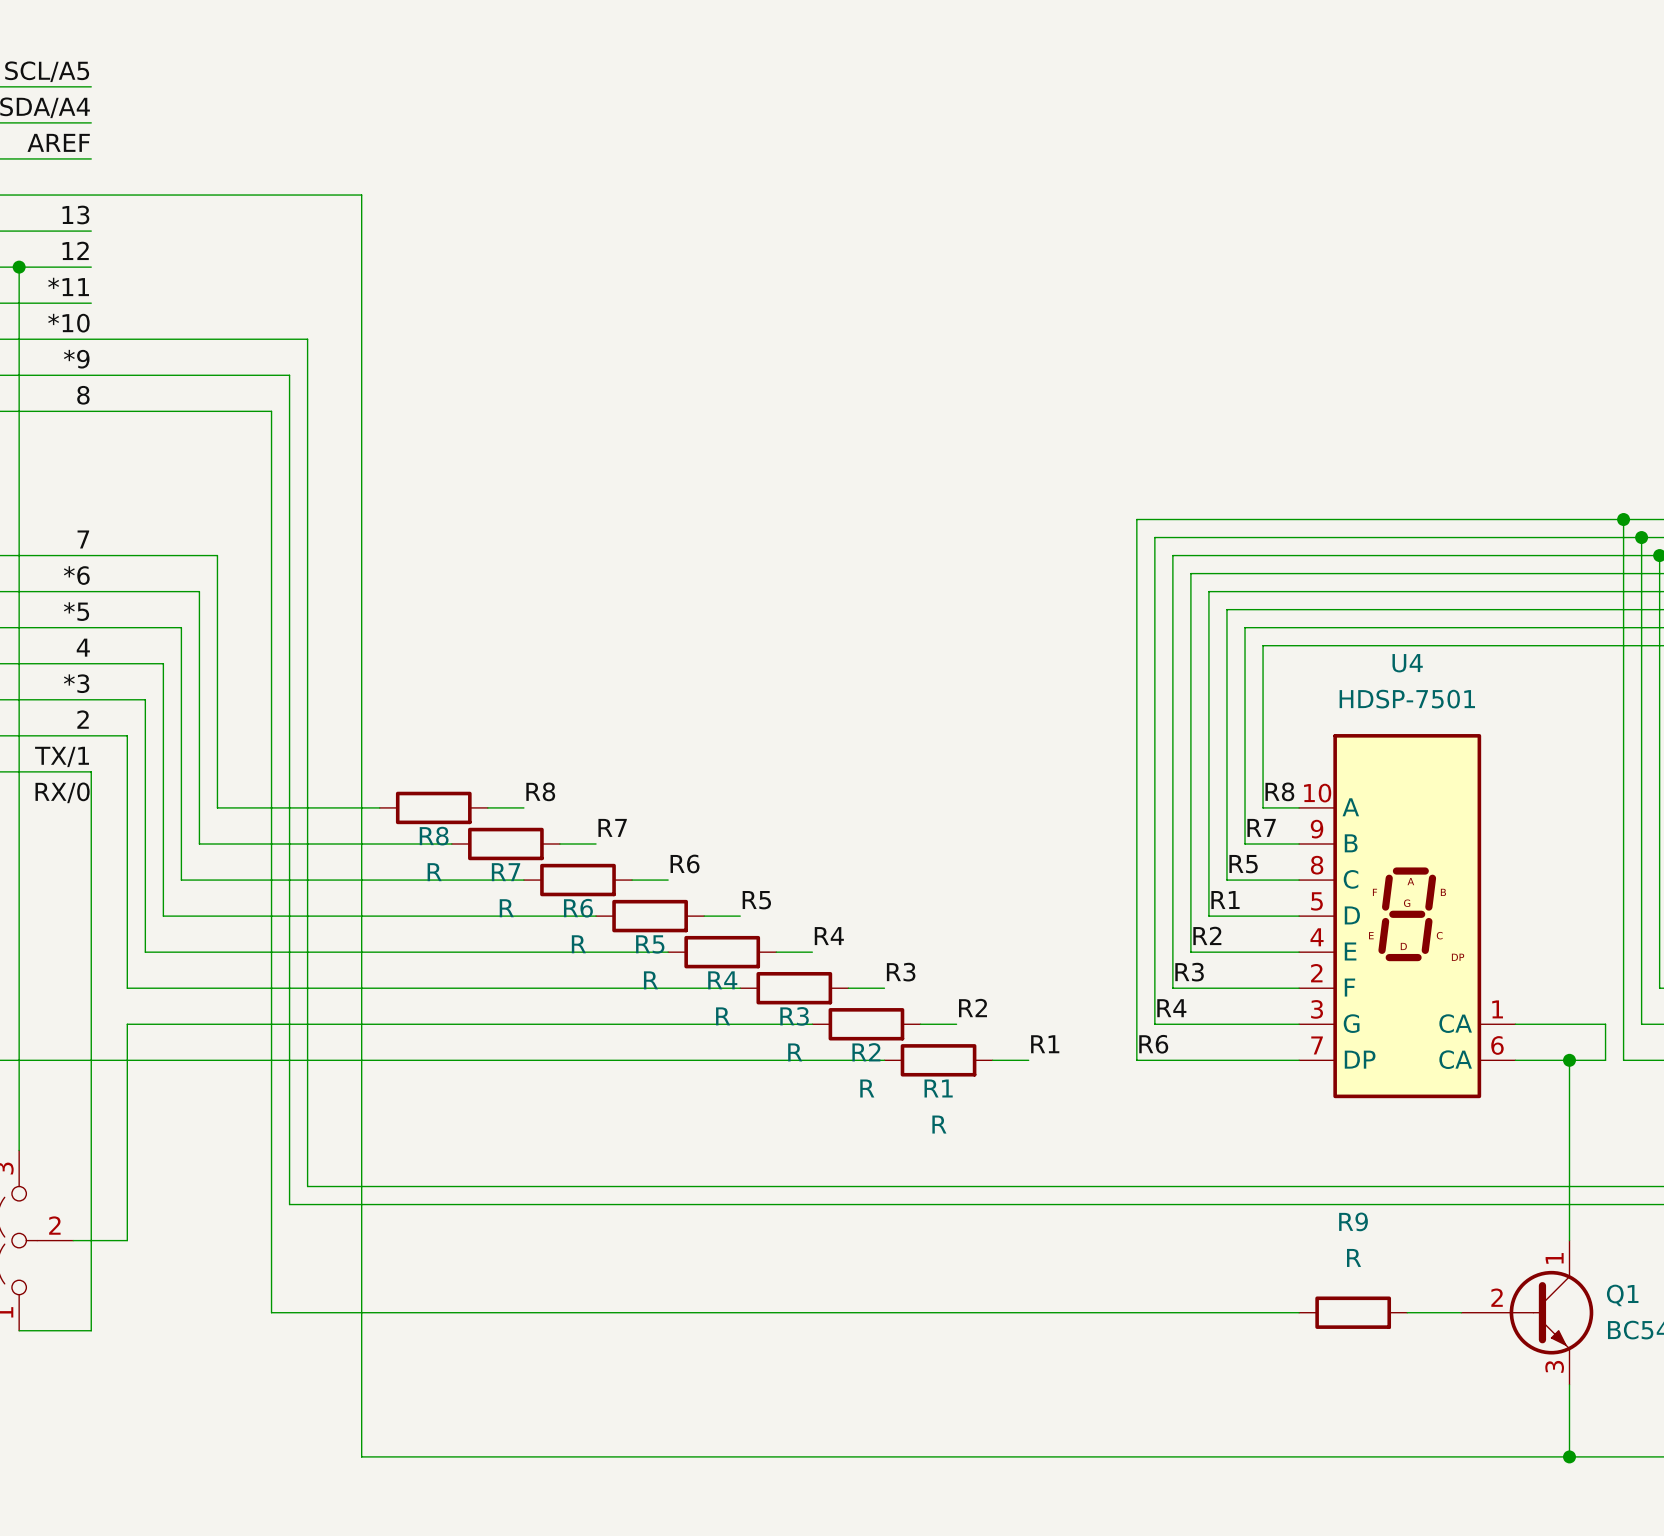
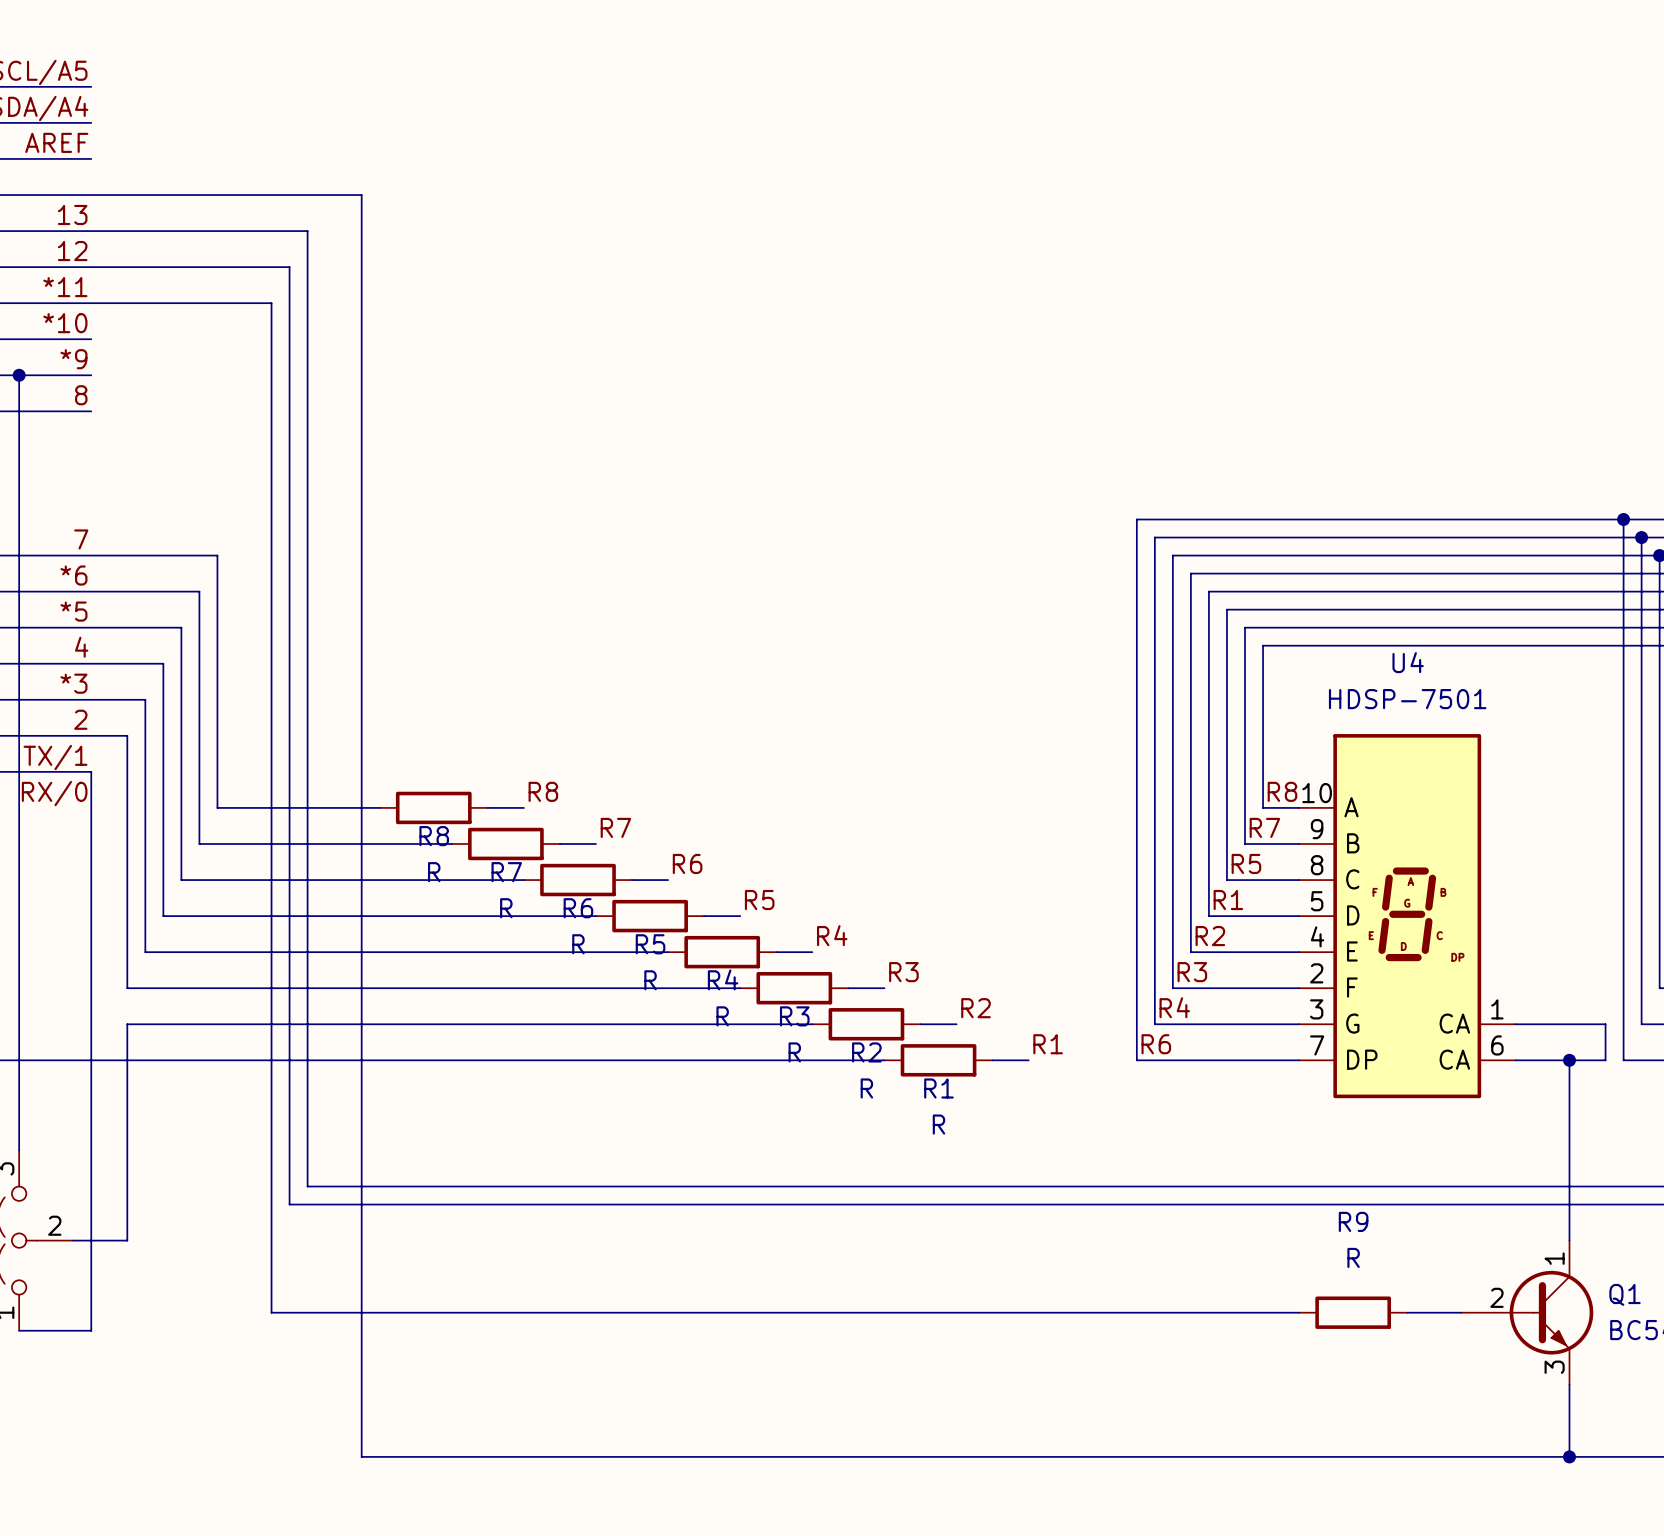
wire: (19, 267) (19, 375) -> none
junction: (19, 267) -> none
wire: (91, 339) (307, 339) -> (91, 231) (307, 231) (307, 339)
junction: none -> (19, 375)
wire: (91, 375) (289, 375) -> (91, 267) (289, 267) (289, 375)
wire: (91, 411) (271, 411) -> (91, 303) (271, 303) (271, 411)

